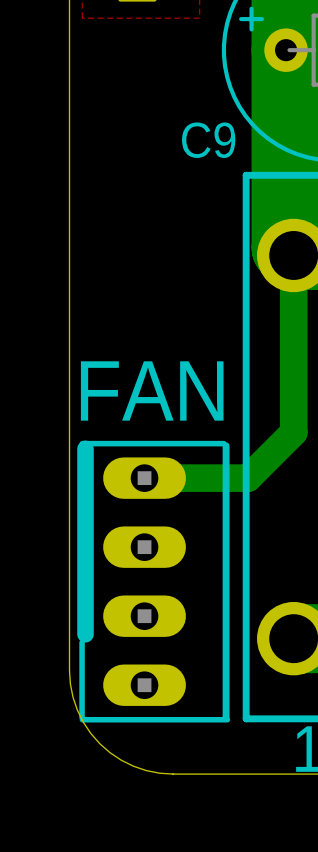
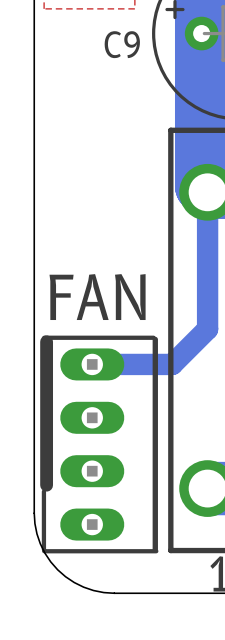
C9 name position: C9 (208, 140) -> C9 (122, 44)

